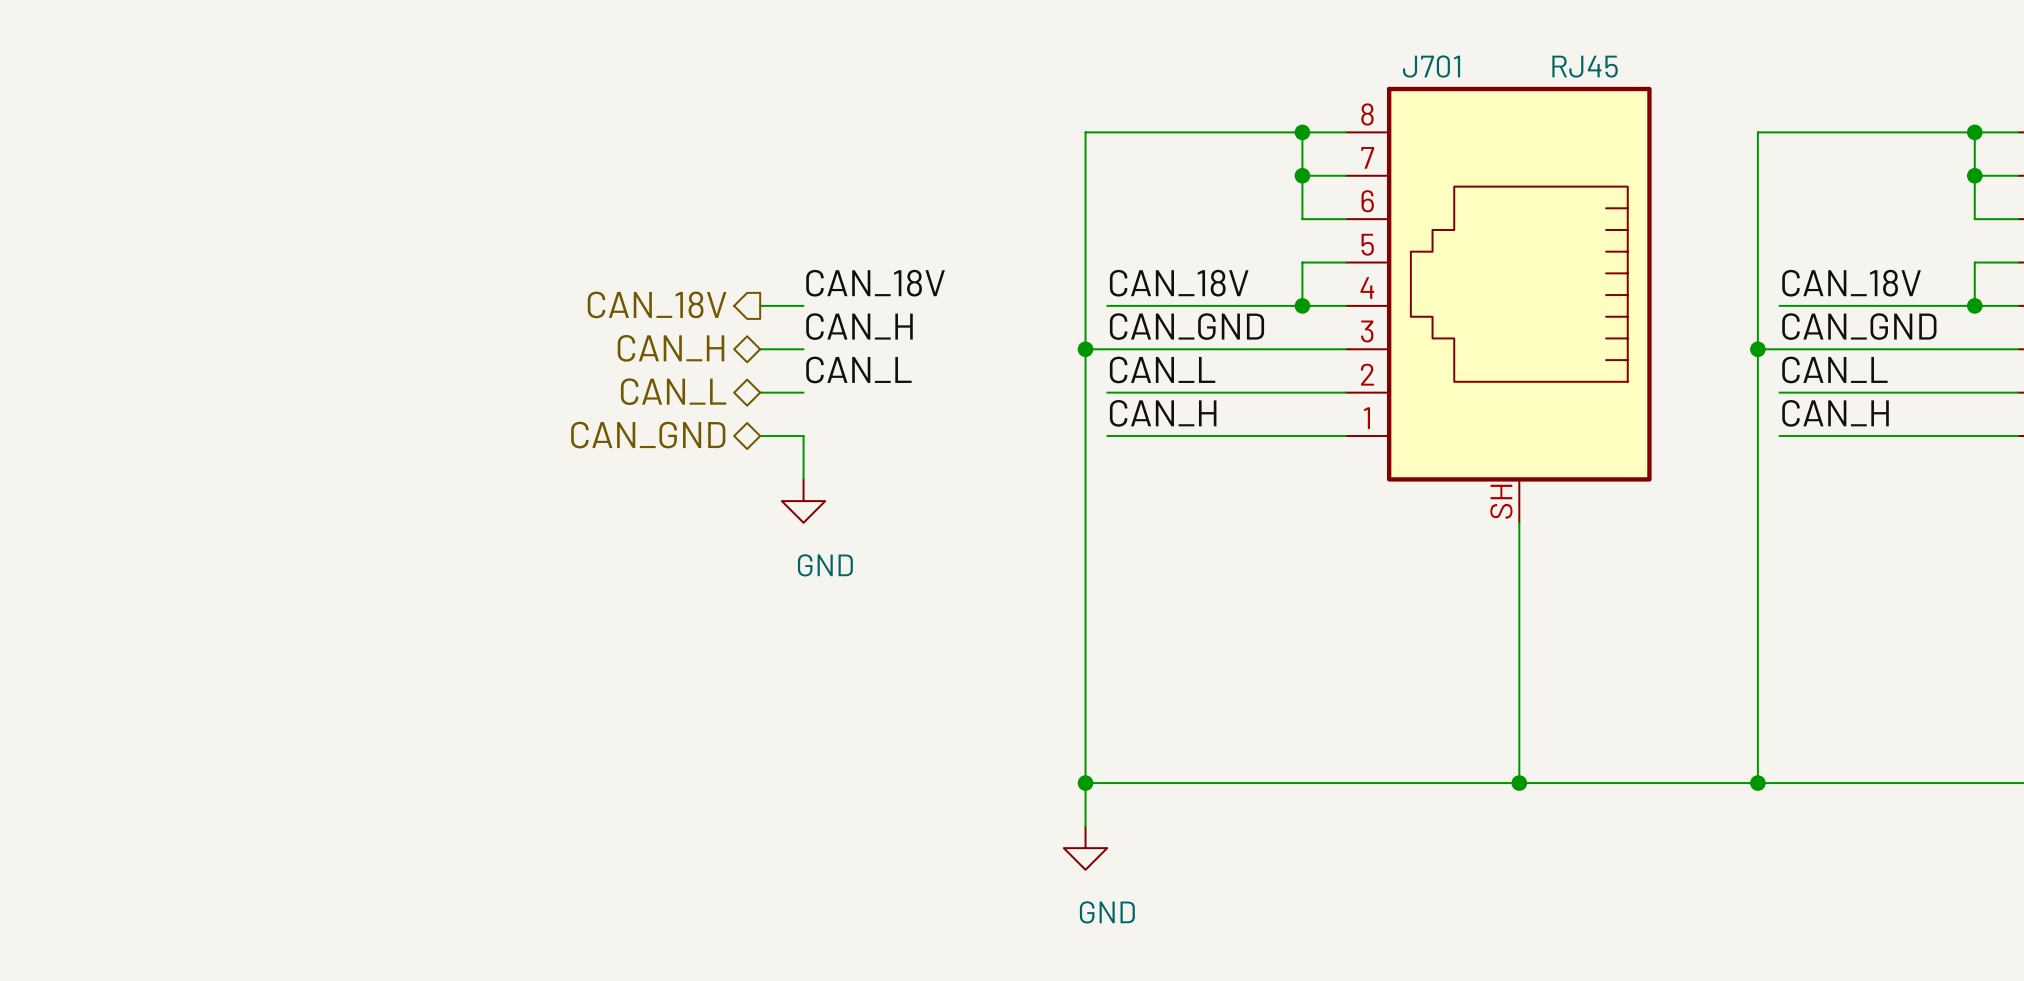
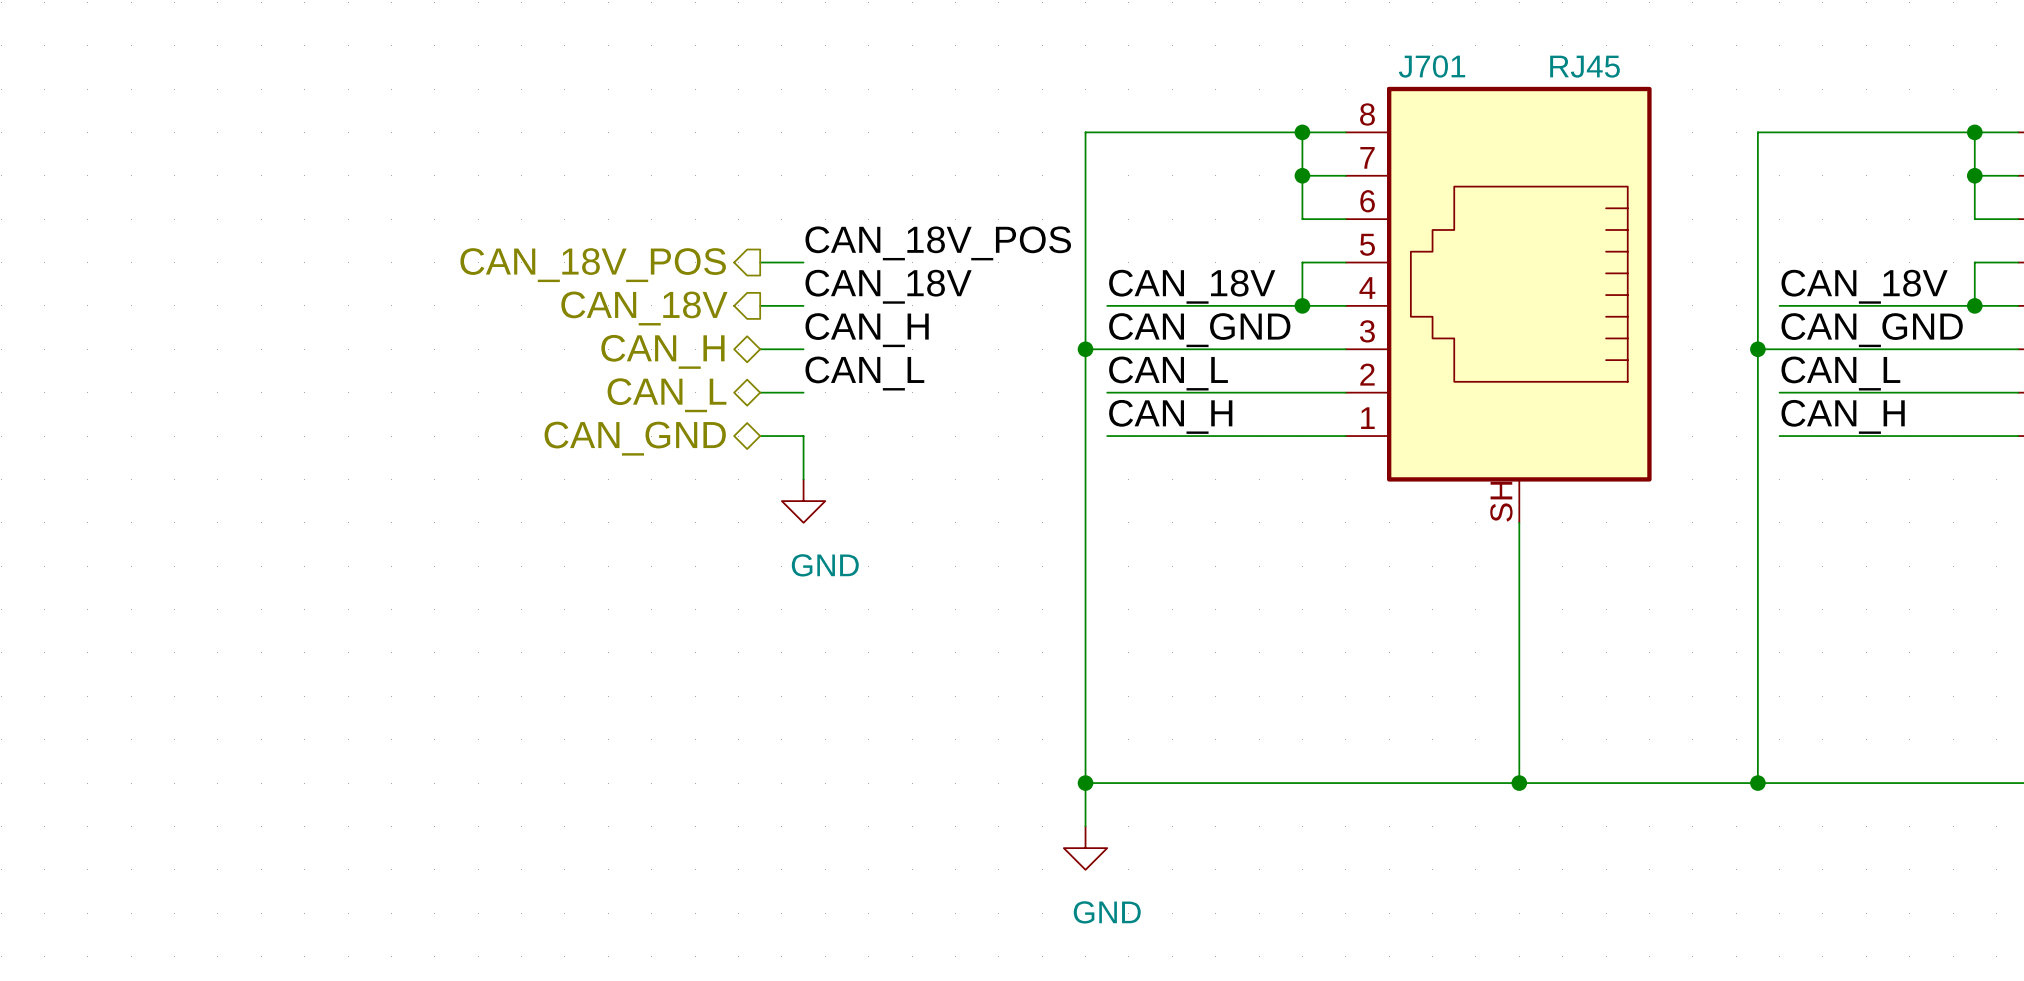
label: none -> CAN_18V_POS (938, 243)
hierarchical label: none -> CAN_18V_POS (593, 265)
wire: none -> (760, 262) (803, 262)

